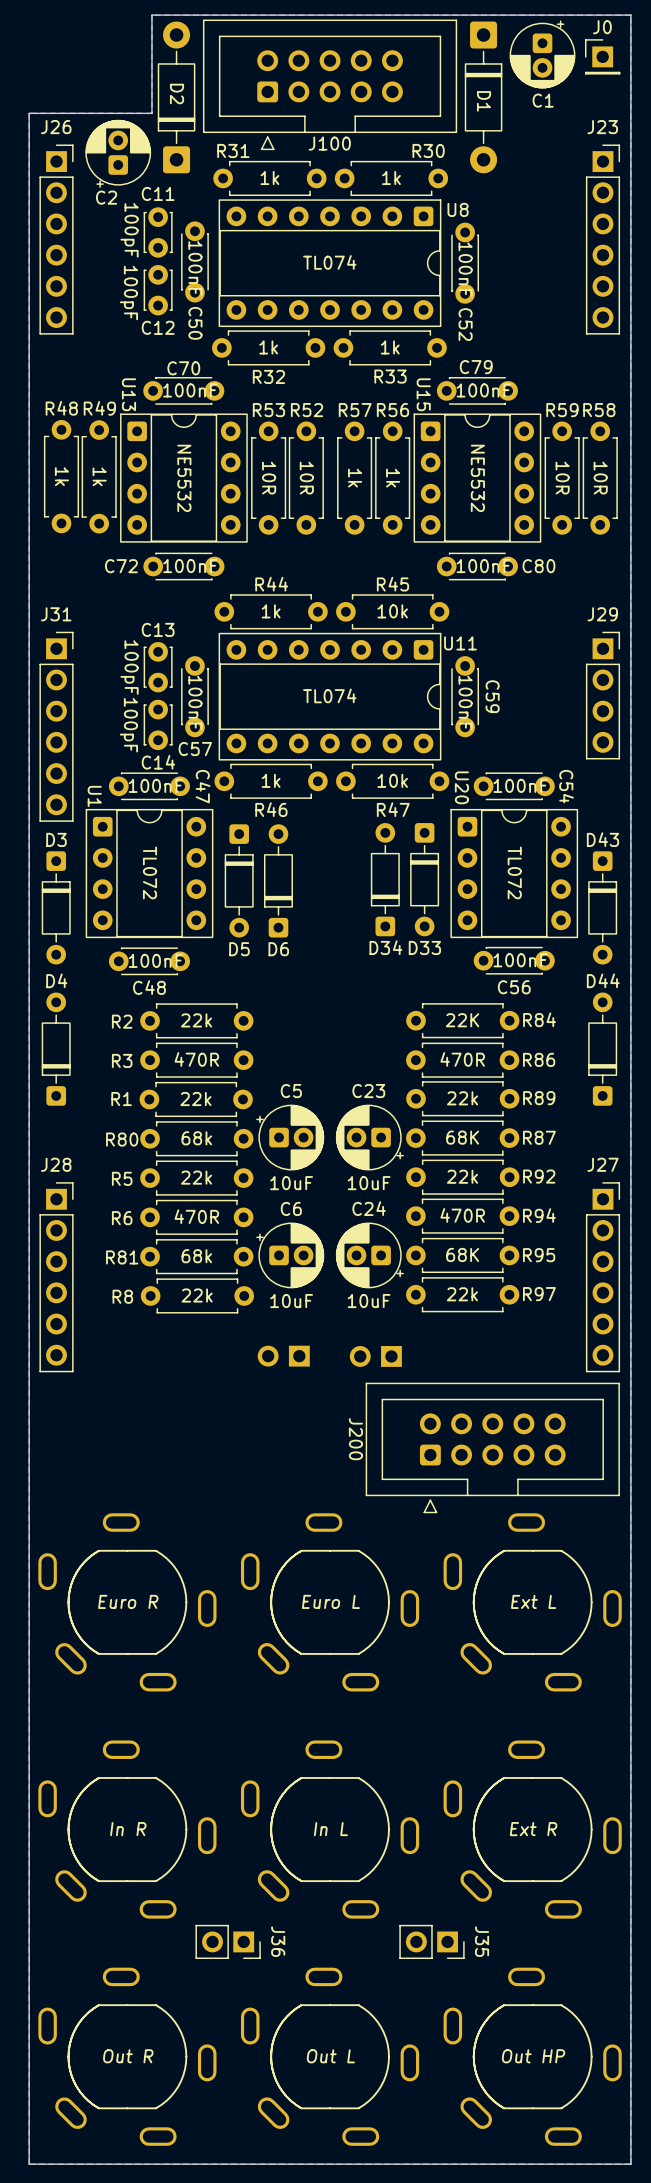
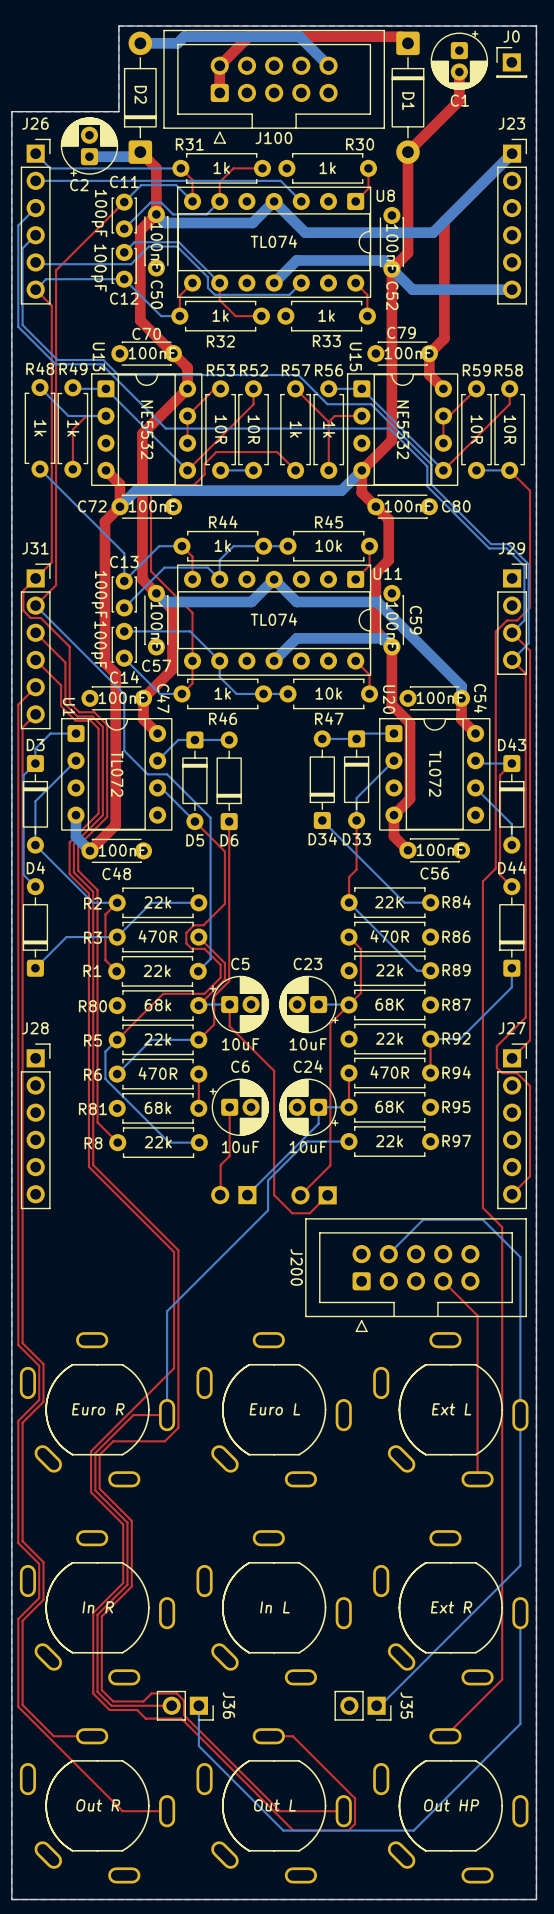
bottom track: none -> (140, 43) (177, 43) (184, 36) (299, 36) (328, 65)
top track: none -> (407, 43) (401, 36) (248, 36) (219, 65) (219, 92)
top track: none -> (459, 71) (459, 100) (407, 152) (407, 252) (391, 269) (391, 440) (361, 470) (361, 492) (388, 519) (388, 560) (375, 573) (375, 630) (391, 646) (391, 704) (410, 723) (410, 799) (393, 815) (393, 836) (407, 850)
bottom track: none -> (140, 152) (135, 156) (89, 156)
top track: none -> (140, 152) (156, 168) (156, 214) (140, 230) (140, 320) (187, 367) (187, 388) (142, 433) (142, 579) (172, 609) (172, 669) (143, 698) (143, 719) (157, 733)
bottom track: none -> (35, 153) (50, 168) (180, 168)
bottom track: none -> (512, 153) (433, 232) (305, 232) (274, 201) (252, 222) (164, 222) (156, 214)
top track: none -> (512, 153) (444, 221) (444, 338) (429, 353) (429, 374) (443, 388)
top track: none -> (180, 168) (192, 180) (192, 201)
top track: none -> (262, 168) (233, 168) (219, 182) (219, 201)
top track: none -> (368, 168) (368, 188) (355, 201)
bottom track: none -> (35, 180) (280, 180) (301, 201)
bottom track: none -> (192, 201) (176, 185) (141, 185) (124, 202)
bottom track: none -> (219, 201) (206, 214) (173, 214) (161, 202) (150, 202) (124, 228)
top track: none -> (124, 202) (56, 270) (56, 585) (35, 605)
bottom track: none -> (35, 208) (18, 225) (18, 326) (55, 364) (101, 364) (165, 428) (389, 428) (427, 466) (427, 486) (489, 548) (506, 548) (524, 566) (524, 620) (512, 632)
bottom track: none -> (35, 235) (22, 248) (22, 325) (57, 360) (103, 360) (118, 375) (298, 375) (316, 393)
bottom track: none -> (124, 252) (134, 242) (178, 242) (219, 283)
bottom track: none -> (35, 262) (37, 264) (131, 264) (148, 246) (177, 246) (207, 277) (207, 287) (214, 294) (289, 294) (301, 283)
top track: none -> (192, 283) (179, 295) (179, 316)
top track: none -> (219, 283) (219, 300) (235, 316) (261, 316)
bottom track: none -> (274, 283) (296, 260) (383, 260) (412, 289) (512, 289)
top track: none -> (355, 283) (367, 294) (367, 316)
bottom track: none -> (35, 289) (46, 279) (124, 279) (161, 316) (179, 316)
top track: none -> (35, 289) (51, 305) (51, 562) (23, 590) (23, 610) (30, 617) (40, 617) (69, 646) (69, 702) (79, 712) (94, 712) (107, 725) (107, 817) (78, 846) (78, 870) (97, 889) (97, 1122) (117, 1142)
bottom track: none -> (40, 387) (68, 416) (105, 416)
bottom track: none -> (72, 387) (105, 388) (187, 470)
top track: none -> (220, 388) (214, 388) (187, 416) (187, 443)
top track: none -> (253, 388) (253, 404) (187, 470)
top track: none -> (295, 388) (328, 422)
bottom track: none -> (328, 388) (361, 388) (443, 470)
top track: none -> (476, 388) (449, 416) (443, 416) (443, 443)
top track: none -> (509, 388) (509, 404) (443, 470)
bottom track: none -> (316, 393) (327, 404) (371, 404) (431, 464) (431, 484) (491, 544) (508, 544) (528, 564) (528, 643) (512, 660)
top track: none -> (105, 416) (86, 416) (72, 429) (72, 469)
top track: none -> (361, 416) (334, 416) (328, 422)
top track: none -> (328, 422) (328, 470)
bottom track: none -> (40, 469) (124, 553) (124, 581) (159, 546) (181, 546)
top track: none -> (105, 470) (119, 484) (119, 506) (105, 521) (105, 663) (115, 673) (115, 825) (89, 850)
bottom track: none -> (253, 470) (220, 470)
top track: none -> (295, 470) (277, 452) (216, 452) (204, 463) (204, 474) (193, 485) (159, 485) (151, 493) (151, 571) (192, 612) (192, 683) (181, 693)
bottom track: none -> (361, 470) (341, 490) (136, 490) (119, 506)
bottom track: none -> (509, 470) (476, 470)
top track: none -> (509, 470) (530, 490) (530, 607) (517, 620) (506, 620) (495, 631) (495, 868) (482, 881) (482, 1207) (502, 1227) (502, 1679) (445, 1736)
top track: none -> (181, 546) (192, 556) (192, 579)
bottom track: none -> (287, 546) (233, 546) (219, 560) (219, 579) (207, 567) (164, 567) (124, 607)
top track: none -> (369, 546) (369, 565) (355, 579)
bottom track: none -> (156, 593) (164, 601) (251, 601) (274, 579) (296, 601) (377, 601) (461, 686) (461, 698)
bottom track: none -> (35, 605) (124, 694) (124, 750) (147, 774) (167, 774) (210, 817) (210, 959) (198, 971)
bottom track: none -> (124, 631) (190, 631) (219, 660) (219, 677) (236, 693) (287, 693)
top track: none -> (35, 632) (65, 662) (65, 704) (77, 716) (92, 716) (102, 726) (102, 815) (73, 844) (73, 872) (93, 891) (93, 1165) (178, 1250) (178, 1427) (164, 1441) (113, 1441) (99, 1454) (99, 1488) (131, 1520) (131, 1586) (101, 1616) (101, 1690) (113, 1701) (143, 1701) (151, 1693) (176, 1693) (184, 1700) (184, 1715) (280, 1811) (343, 1811)
top track: none -> (512, 632) (530, 650) (530, 1040) (512, 1058)
bottom track: none -> (391, 646) (383, 638) (296, 638) (274, 660)
bottom track: none -> (124, 658) (160, 693) (181, 693)
top track: none -> (35, 660) (61, 685) (61, 706) (75, 720) (90, 720) (98, 728) (98, 813) (69, 842) (69, 874) (88, 893) (88, 1166) (174, 1252) (174, 1368) (91, 1451) (91, 1492) (123, 1524) (123, 1583) (93, 1612) (93, 1693) (109, 1710) (137, 1710) (145, 1718) (181, 1718) (293, 1830) (348, 1830) (355, 1823) (355, 1798) (292, 1736) (268, 1736)
top track: none -> (512, 660) (525, 673) (525, 1017) (496, 1046) (496, 1067) (502, 1073) (517, 1073) (530, 1086) (530, 1176) (512, 1194)
top track: none -> (355, 660) (369, 674) (369, 693)
top track: none -> (35, 687) (18, 704) (18, 1344) (39, 1365) (39, 1400) (18, 1420) (18, 1543) (39, 1563) (39, 1598) (18, 1619) (18, 1706) (122, 1811) (167, 1811)
top track: none -> (461, 698) (461, 719) (475, 733)
top track: none -> (35, 714) (22, 727) (22, 1343) (43, 1364) (43, 1401) (22, 1422) (22, 1541) (43, 1562) (43, 1599) (22, 1620) (22, 1705) (53, 1736) (92, 1736)
bottom track: none -> (75, 733) (50, 733) (35, 748) (35, 763) (23, 775) (23, 874) (35, 886)
bottom track: none -> (393, 733) (363, 733) (358, 738) (322, 738)
bottom track: none -> (229, 739) (178, 739) (157, 760)
bottom track: none -> (75, 760) (35, 801) (35, 845) (93, 902) (117, 902)
bottom track: none -> (393, 760) (356, 798) (356, 820)
bottom track: none -> (475, 760) (478, 763) (511, 763)
top track: none -> (511, 763) (500, 775) (500, 874) (511, 886)
bottom track: none -> (157, 787) (161, 787) (194, 821)
bottom track: none -> (475, 787) (511, 824) (511, 845)
bottom track: none -> (75, 815) (75, 836) (89, 850)
bottom track: none -> (322, 820) (404, 902) (430, 902)
top track: none -> (356, 820) (356, 869) (349, 877) (349, 902)
top track: none -> (194, 821) (224, 851) (224, 903) (203, 925) (193, 925) (186, 932) (186, 943) (191, 948) (204, 948) (220, 964) (220, 977) (204, 993) (163, 993) (117, 1039)
top track: none -> (229, 821) (229, 981) (214, 996) (214, 1024) (198, 1039)
top track: none -> (117, 902) (105, 914) (105, 960) (116, 971)
bottom track: none -> (198, 902) (151, 902) (117, 937) (66, 937) (35, 968)
bottom track: none -> (349, 902) (417, 970) (430, 970)
top track: none -> (198, 937) (224, 963) (224, 979) (198, 1005)
top track: none -> (348, 937) (360, 948) (360, 993) (330, 1023) (330, 1165) (300, 1195)
bottom track: none -> (511, 968) (511, 987) (460, 1039) (430, 1039)
bottom track: none -> (229, 1004) (198, 1005)
top track: none -> (229, 1004) (229, 1026) (274, 1070) (274, 1195) (292, 1213) (309, 1213) (327, 1195)
bottom track: none -> (318, 1004) (348, 1004)
top track: none -> (430, 1039) (430, 1073)
bottom track: none -> (117, 1039) (105, 1051) (105, 1078) (169, 1142) (199, 1142)
bottom track: none -> (198, 1039) (151, 1039) (117, 1074)
top track: none -> (348, 1073) (348, 1107)
top track: none -> (198, 1074) (198, 1108)
top track: none -> (229, 1107) (229, 1156) (220, 1165) (220, 1195)
bottom track: none -> (348, 1107) (318, 1107) (318, 1123) (247, 1195)
bottom track: none -> (348, 1141) (306, 1141) (268, 1180) (268, 1210) (167, 1311) (167, 1415)
bottom track: none -> (388, 1254) (423, 1219) (482, 1219) (520, 1257) (520, 1565) (380, 1705) (376, 1705)
top track: none -> (443, 1281) (477, 1315) (477, 1479)
top track: none -> (167, 1415) (133, 1415) (95, 1453) (95, 1490) (127, 1522) (127, 1584) (97, 1614) (97, 1691) (111, 1705) (171, 1705)
bottom track: none -> (520, 1613) (520, 1723) (413, 1830) (283, 1830) (198, 1746) (198, 1705)

